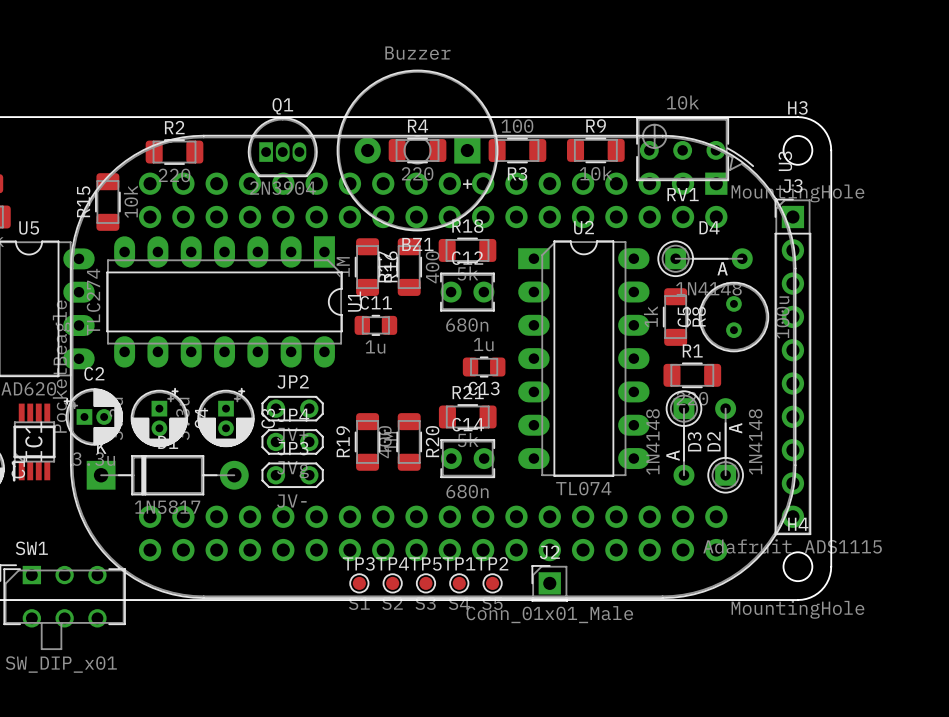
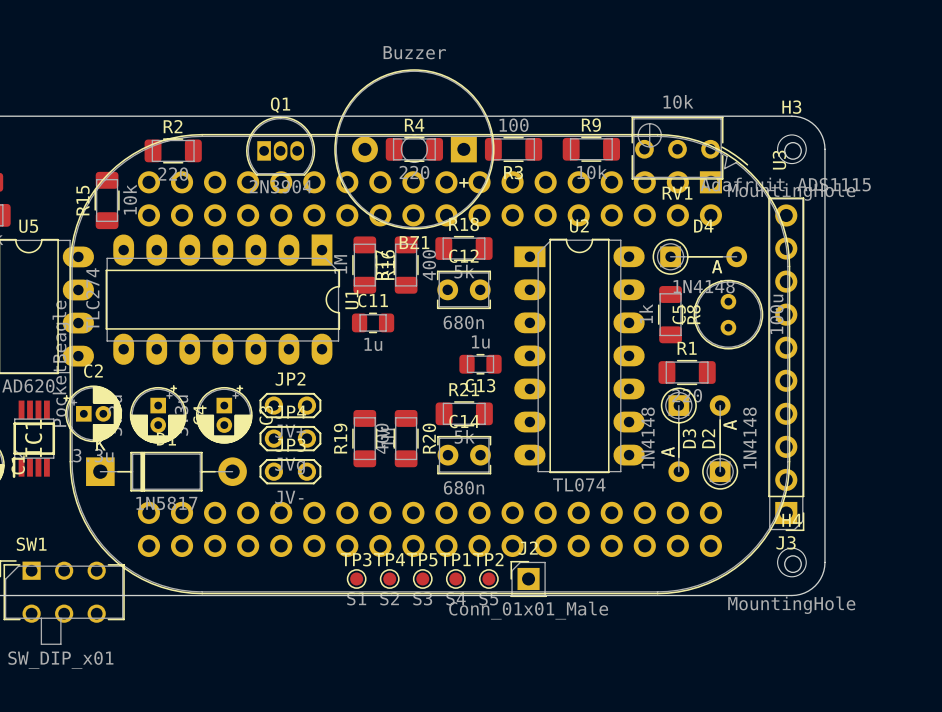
round board edge: none -> [784, 141, 802, 160]
J3 rotation: 0° (792, 366) -> 180° (786, 364)
round board edge: none -> [784, 555, 802, 574]
J2 position: (549, 583) -> (528, 578)

